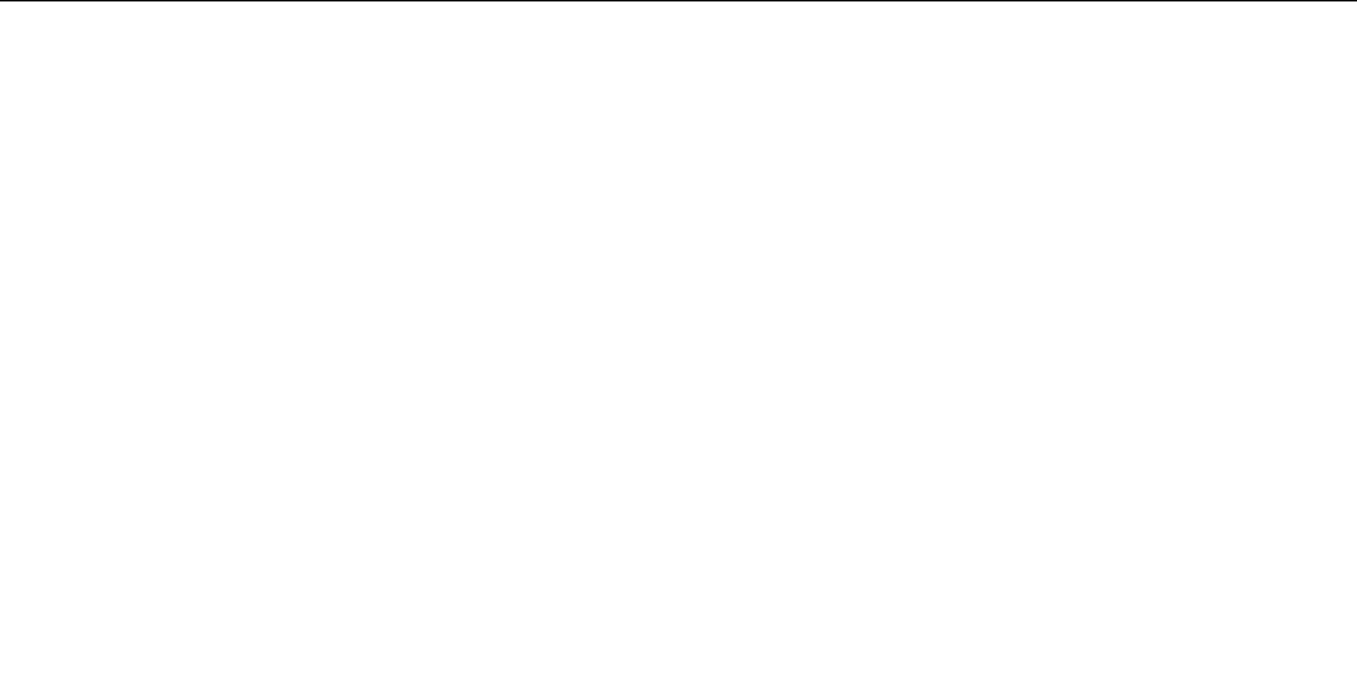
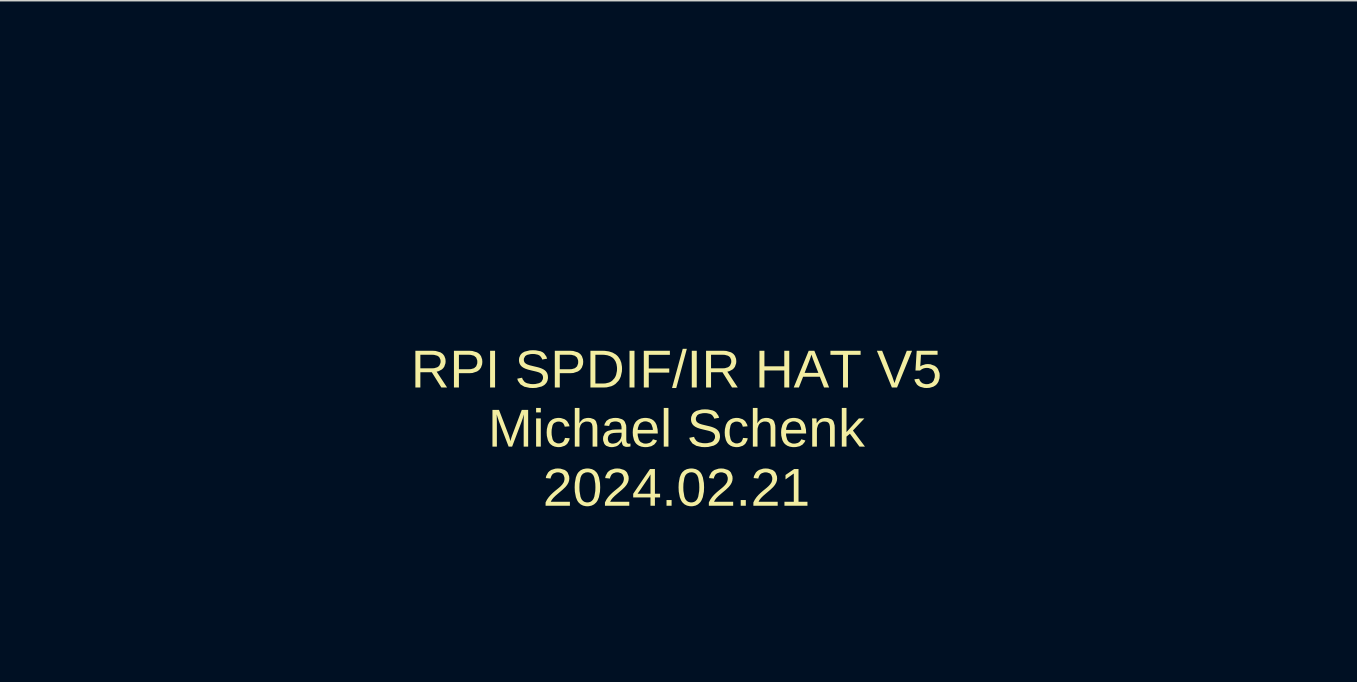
text: none -> RPI SPDIF/IR HAT V5 (677, 368)
text: none -> Michael Schenk (678, 427)
text: none -> 2024.02.21 (676, 487)

